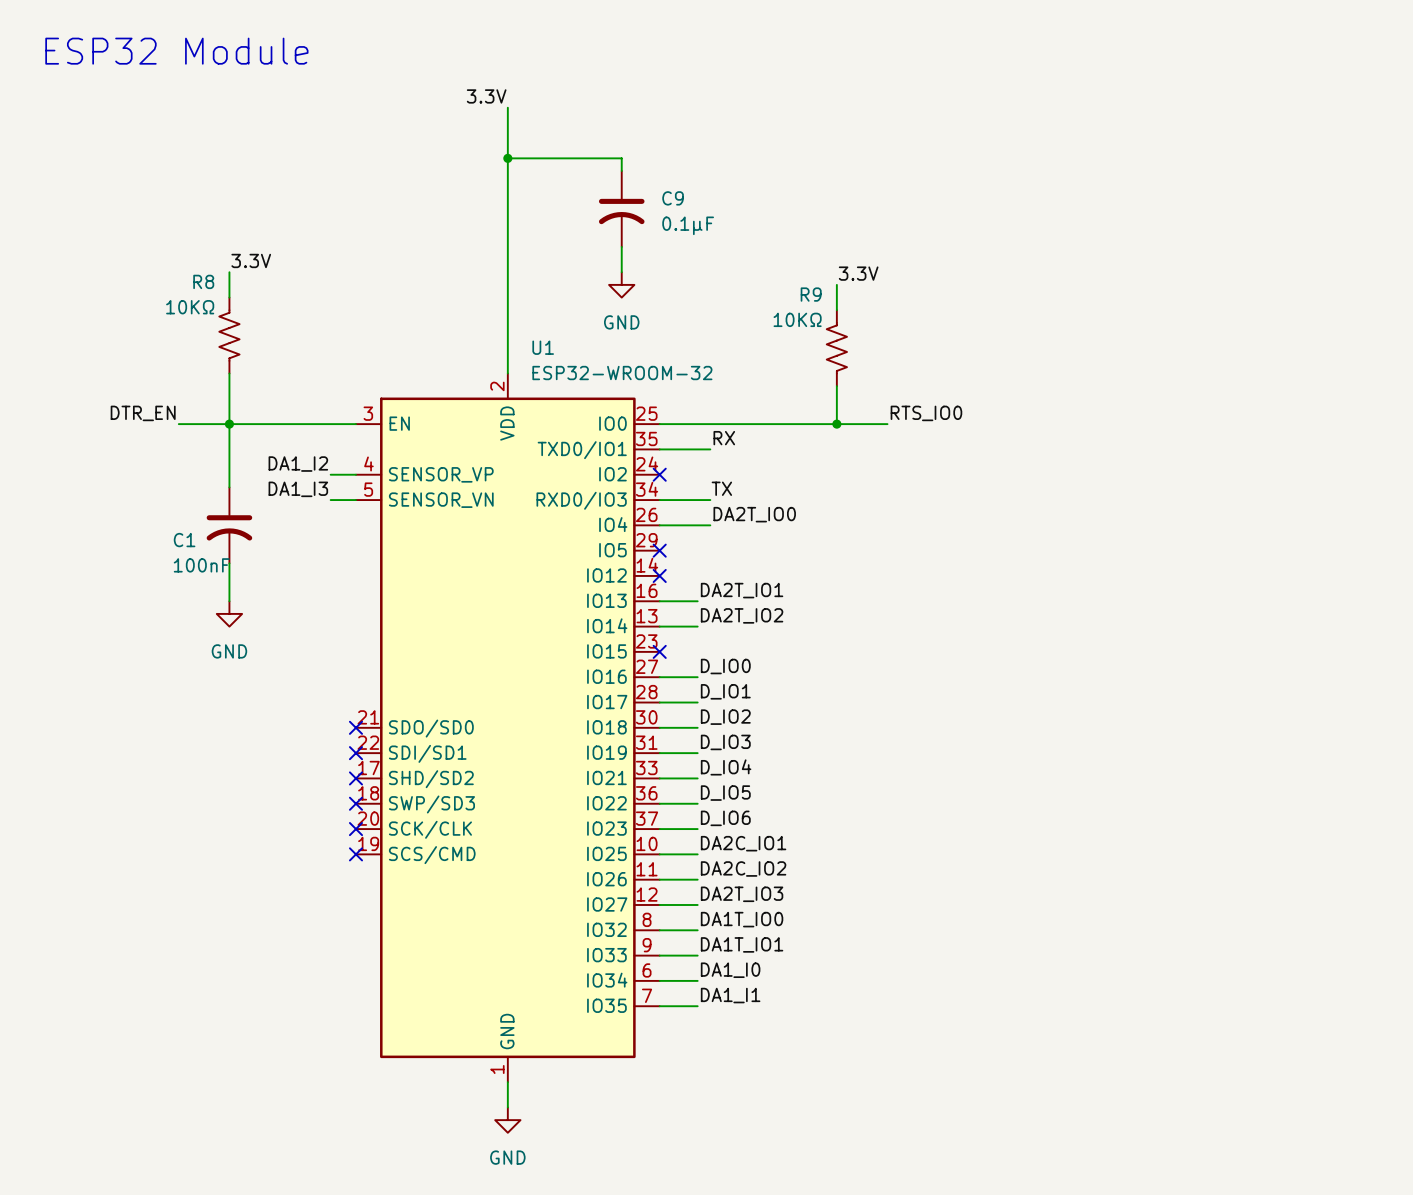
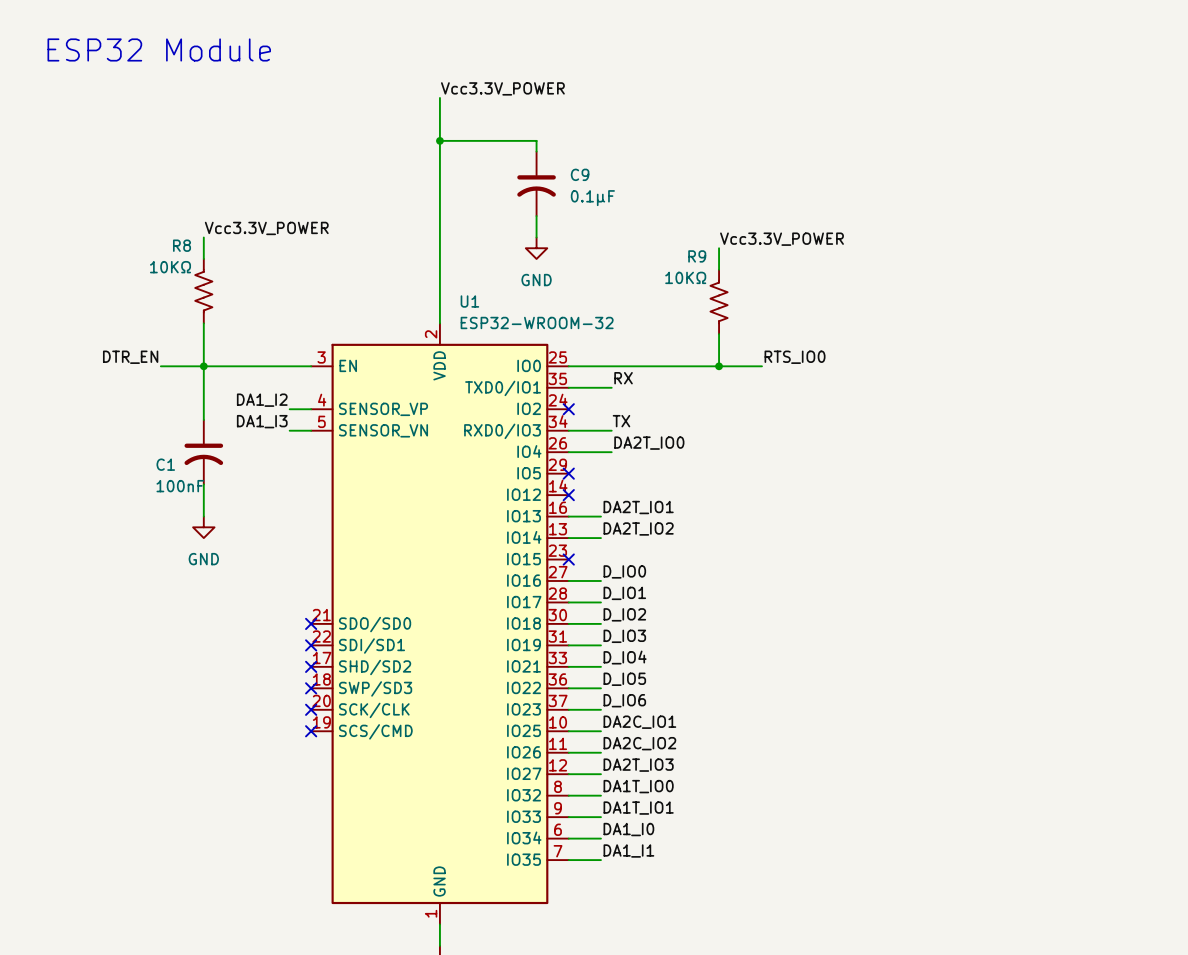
label: 3.3V (486, 96) -> Vcc3.3V_POWER (502, 88)
label: 3.3V (251, 260) -> Vcc3.3V_POWER (266, 228)
label: 3.3V (858, 273) -> Vcc3.3V_POWER (781, 239)

